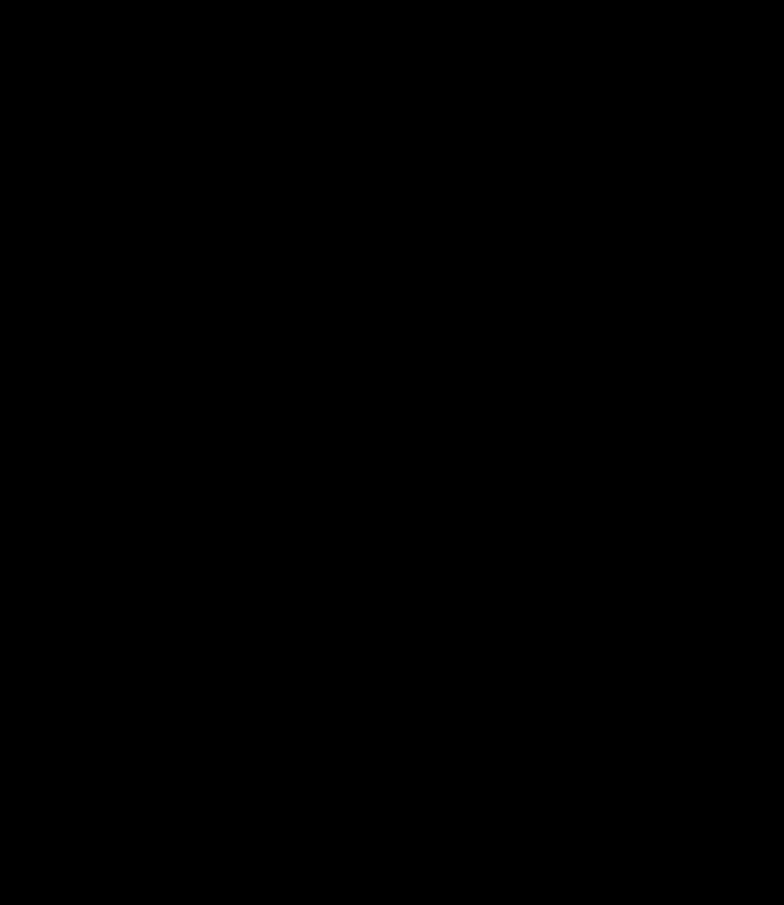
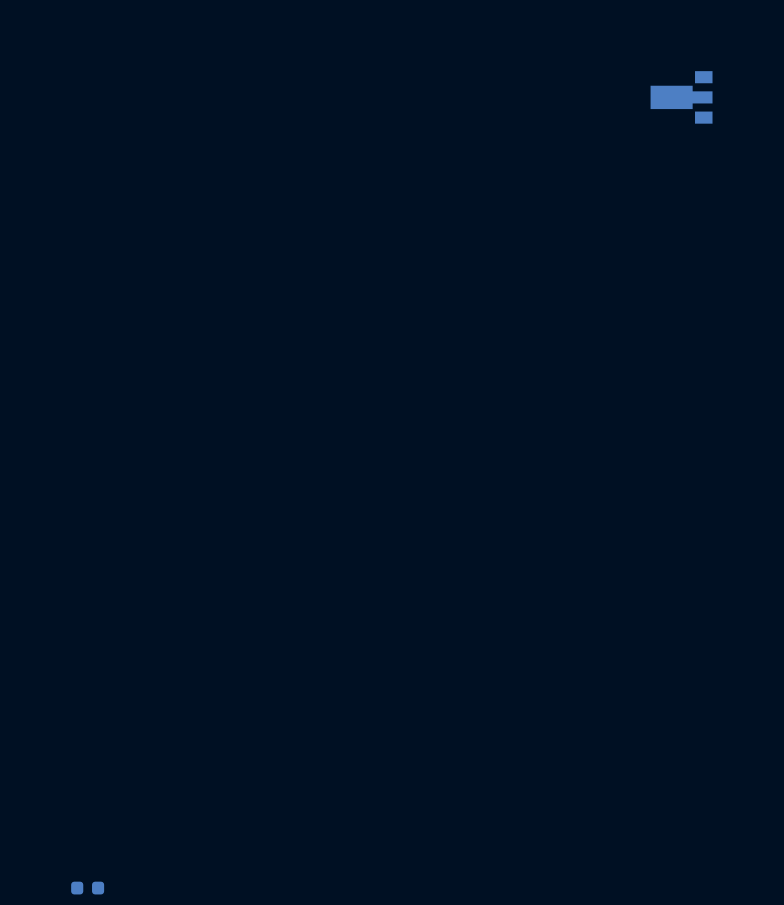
part: none -> (681, 97)
part: none -> (87, 888)

